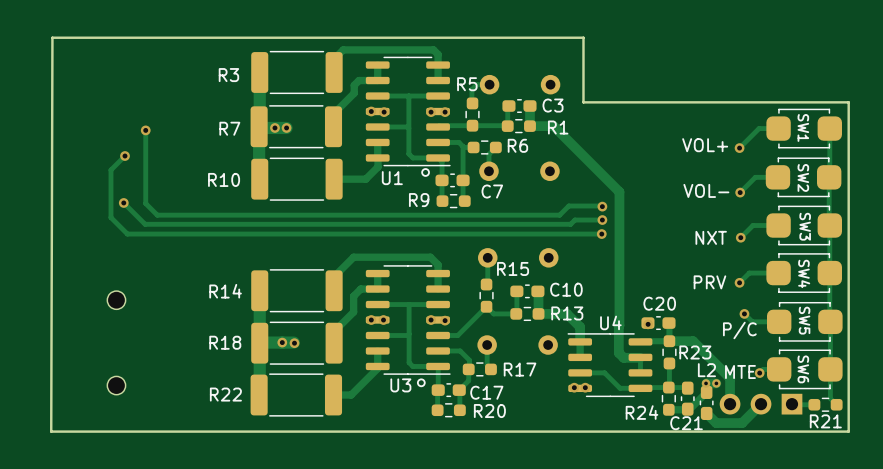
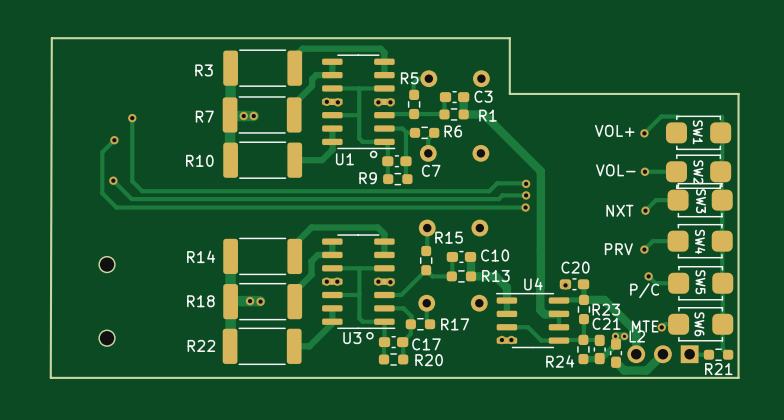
SW1 position: (804, 128) -> (698, 132)
track: (777, 177) (755, 177) (740, 192) -> (676, 171) (644, 171)
SW2 position: (803, 177) -> (698, 171)
L2 name position: L2 (706, 370) -> L2 (637, 336)
C21 name position: C21 (686, 423) -> C21 (606, 323)

